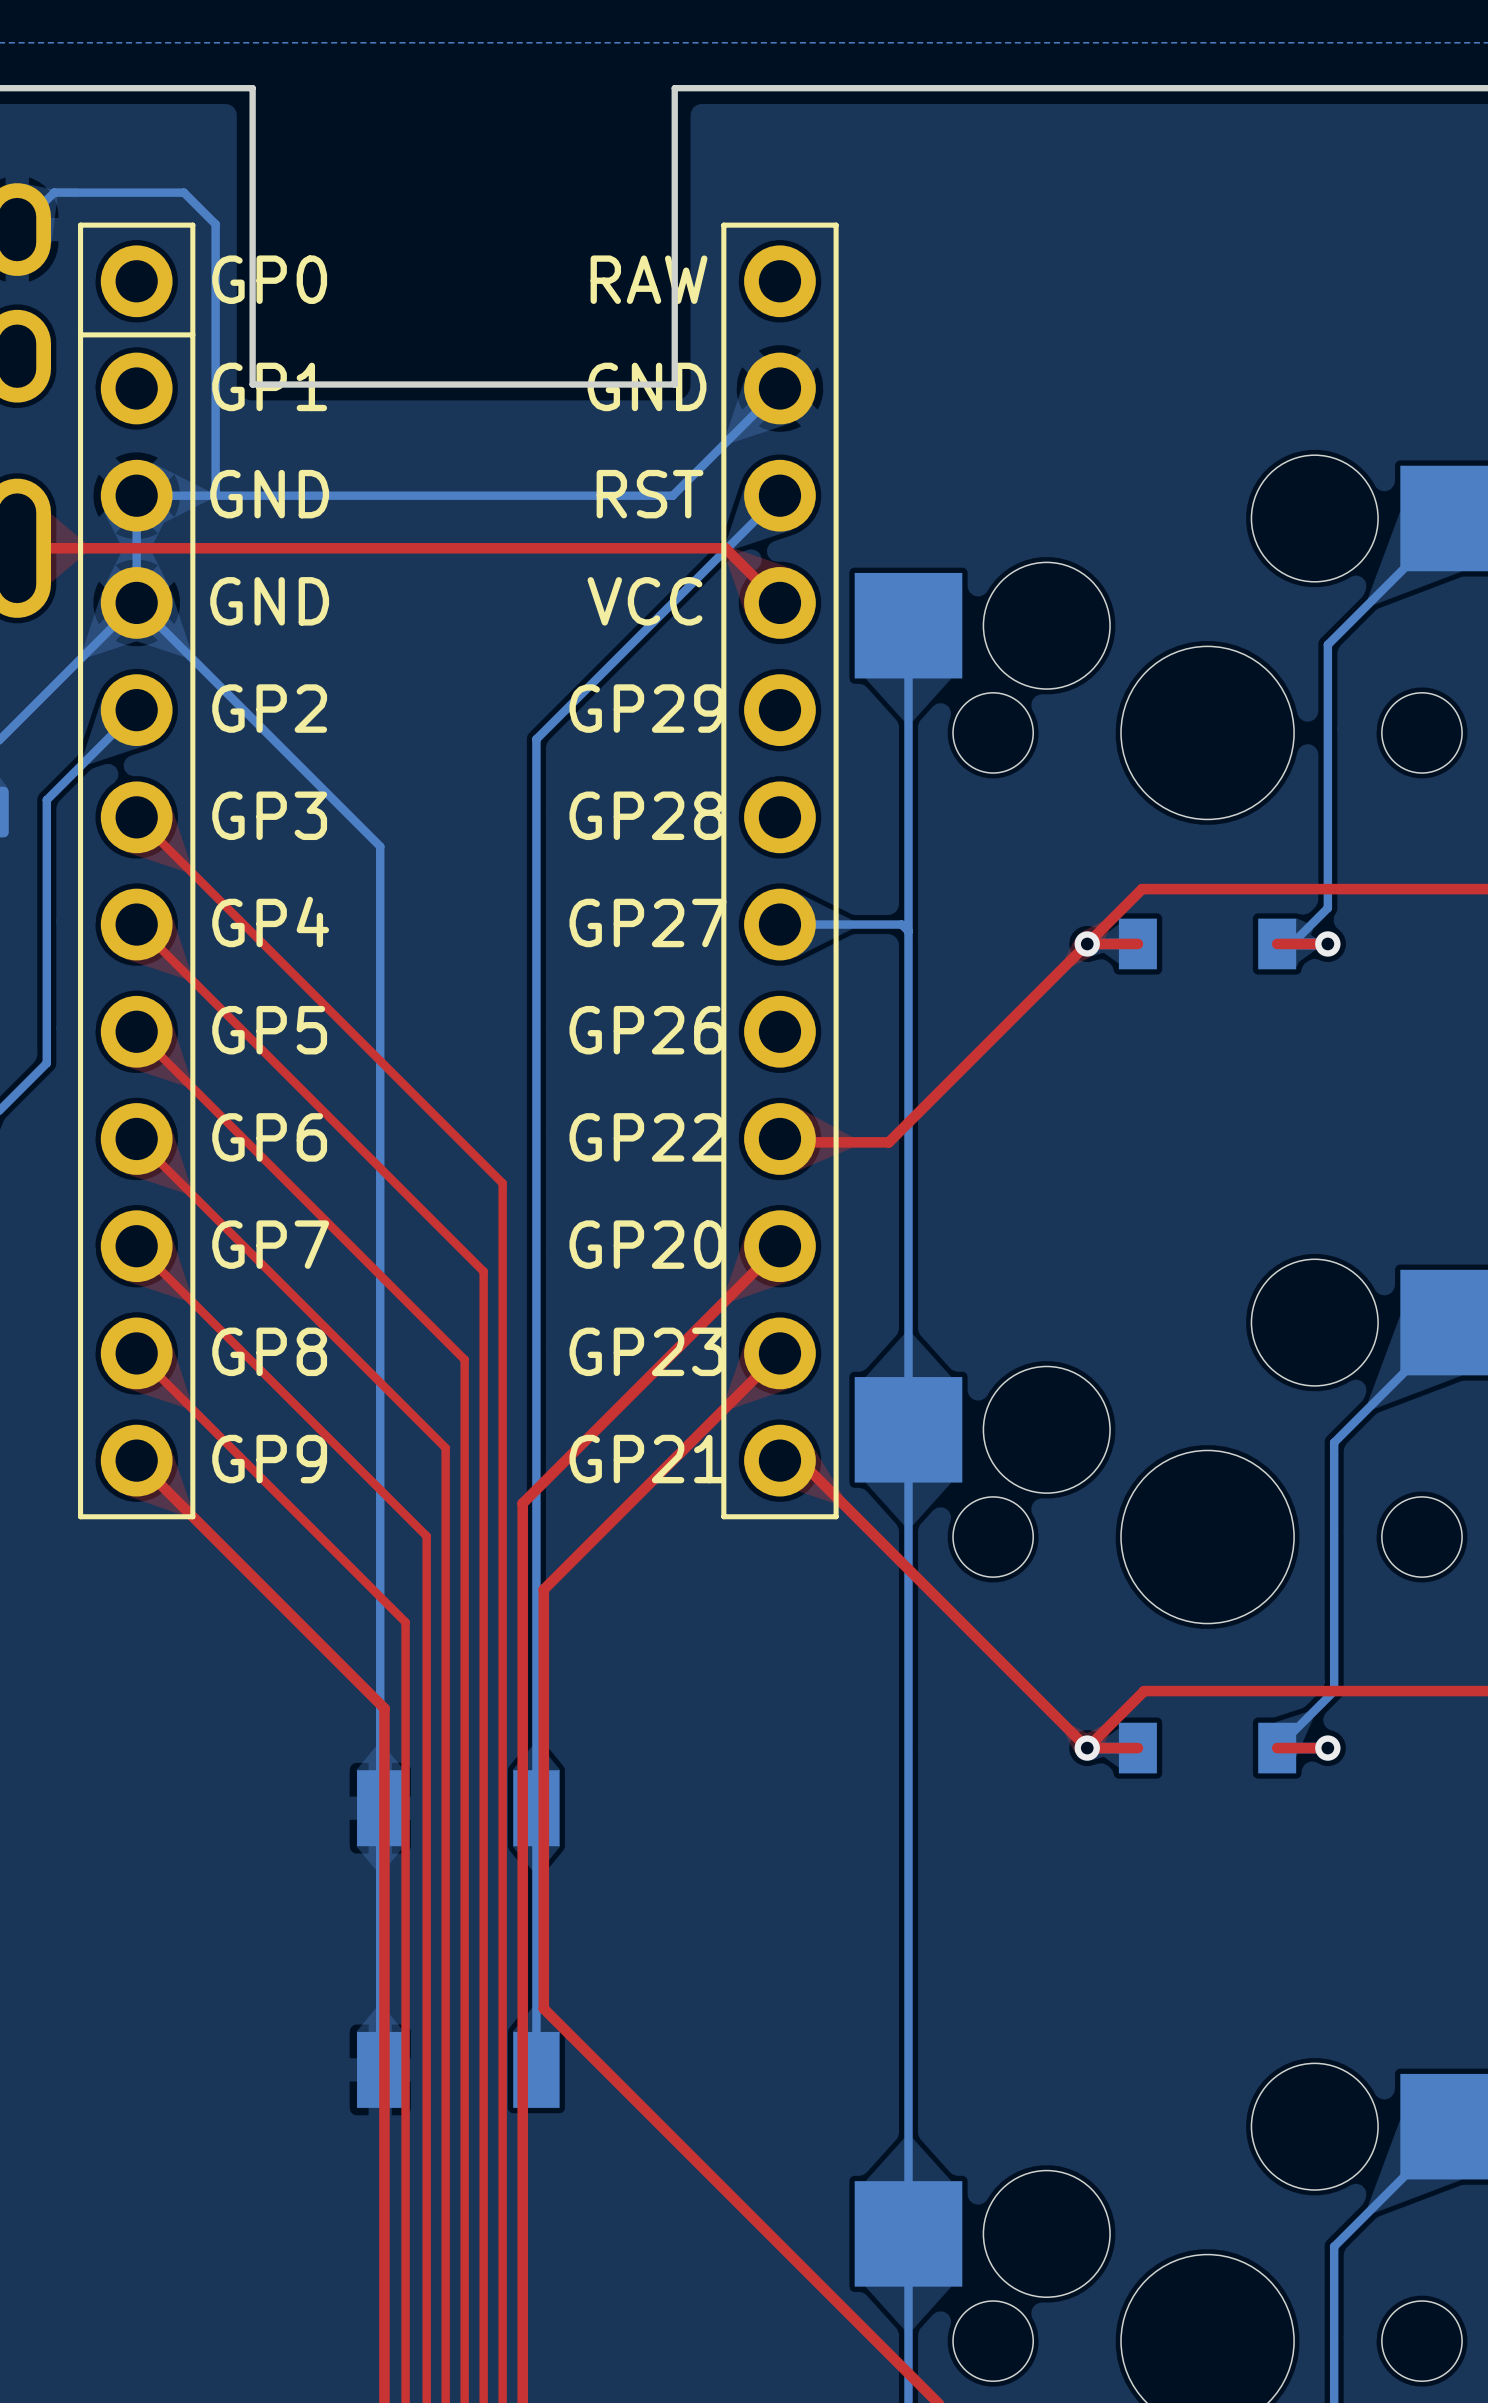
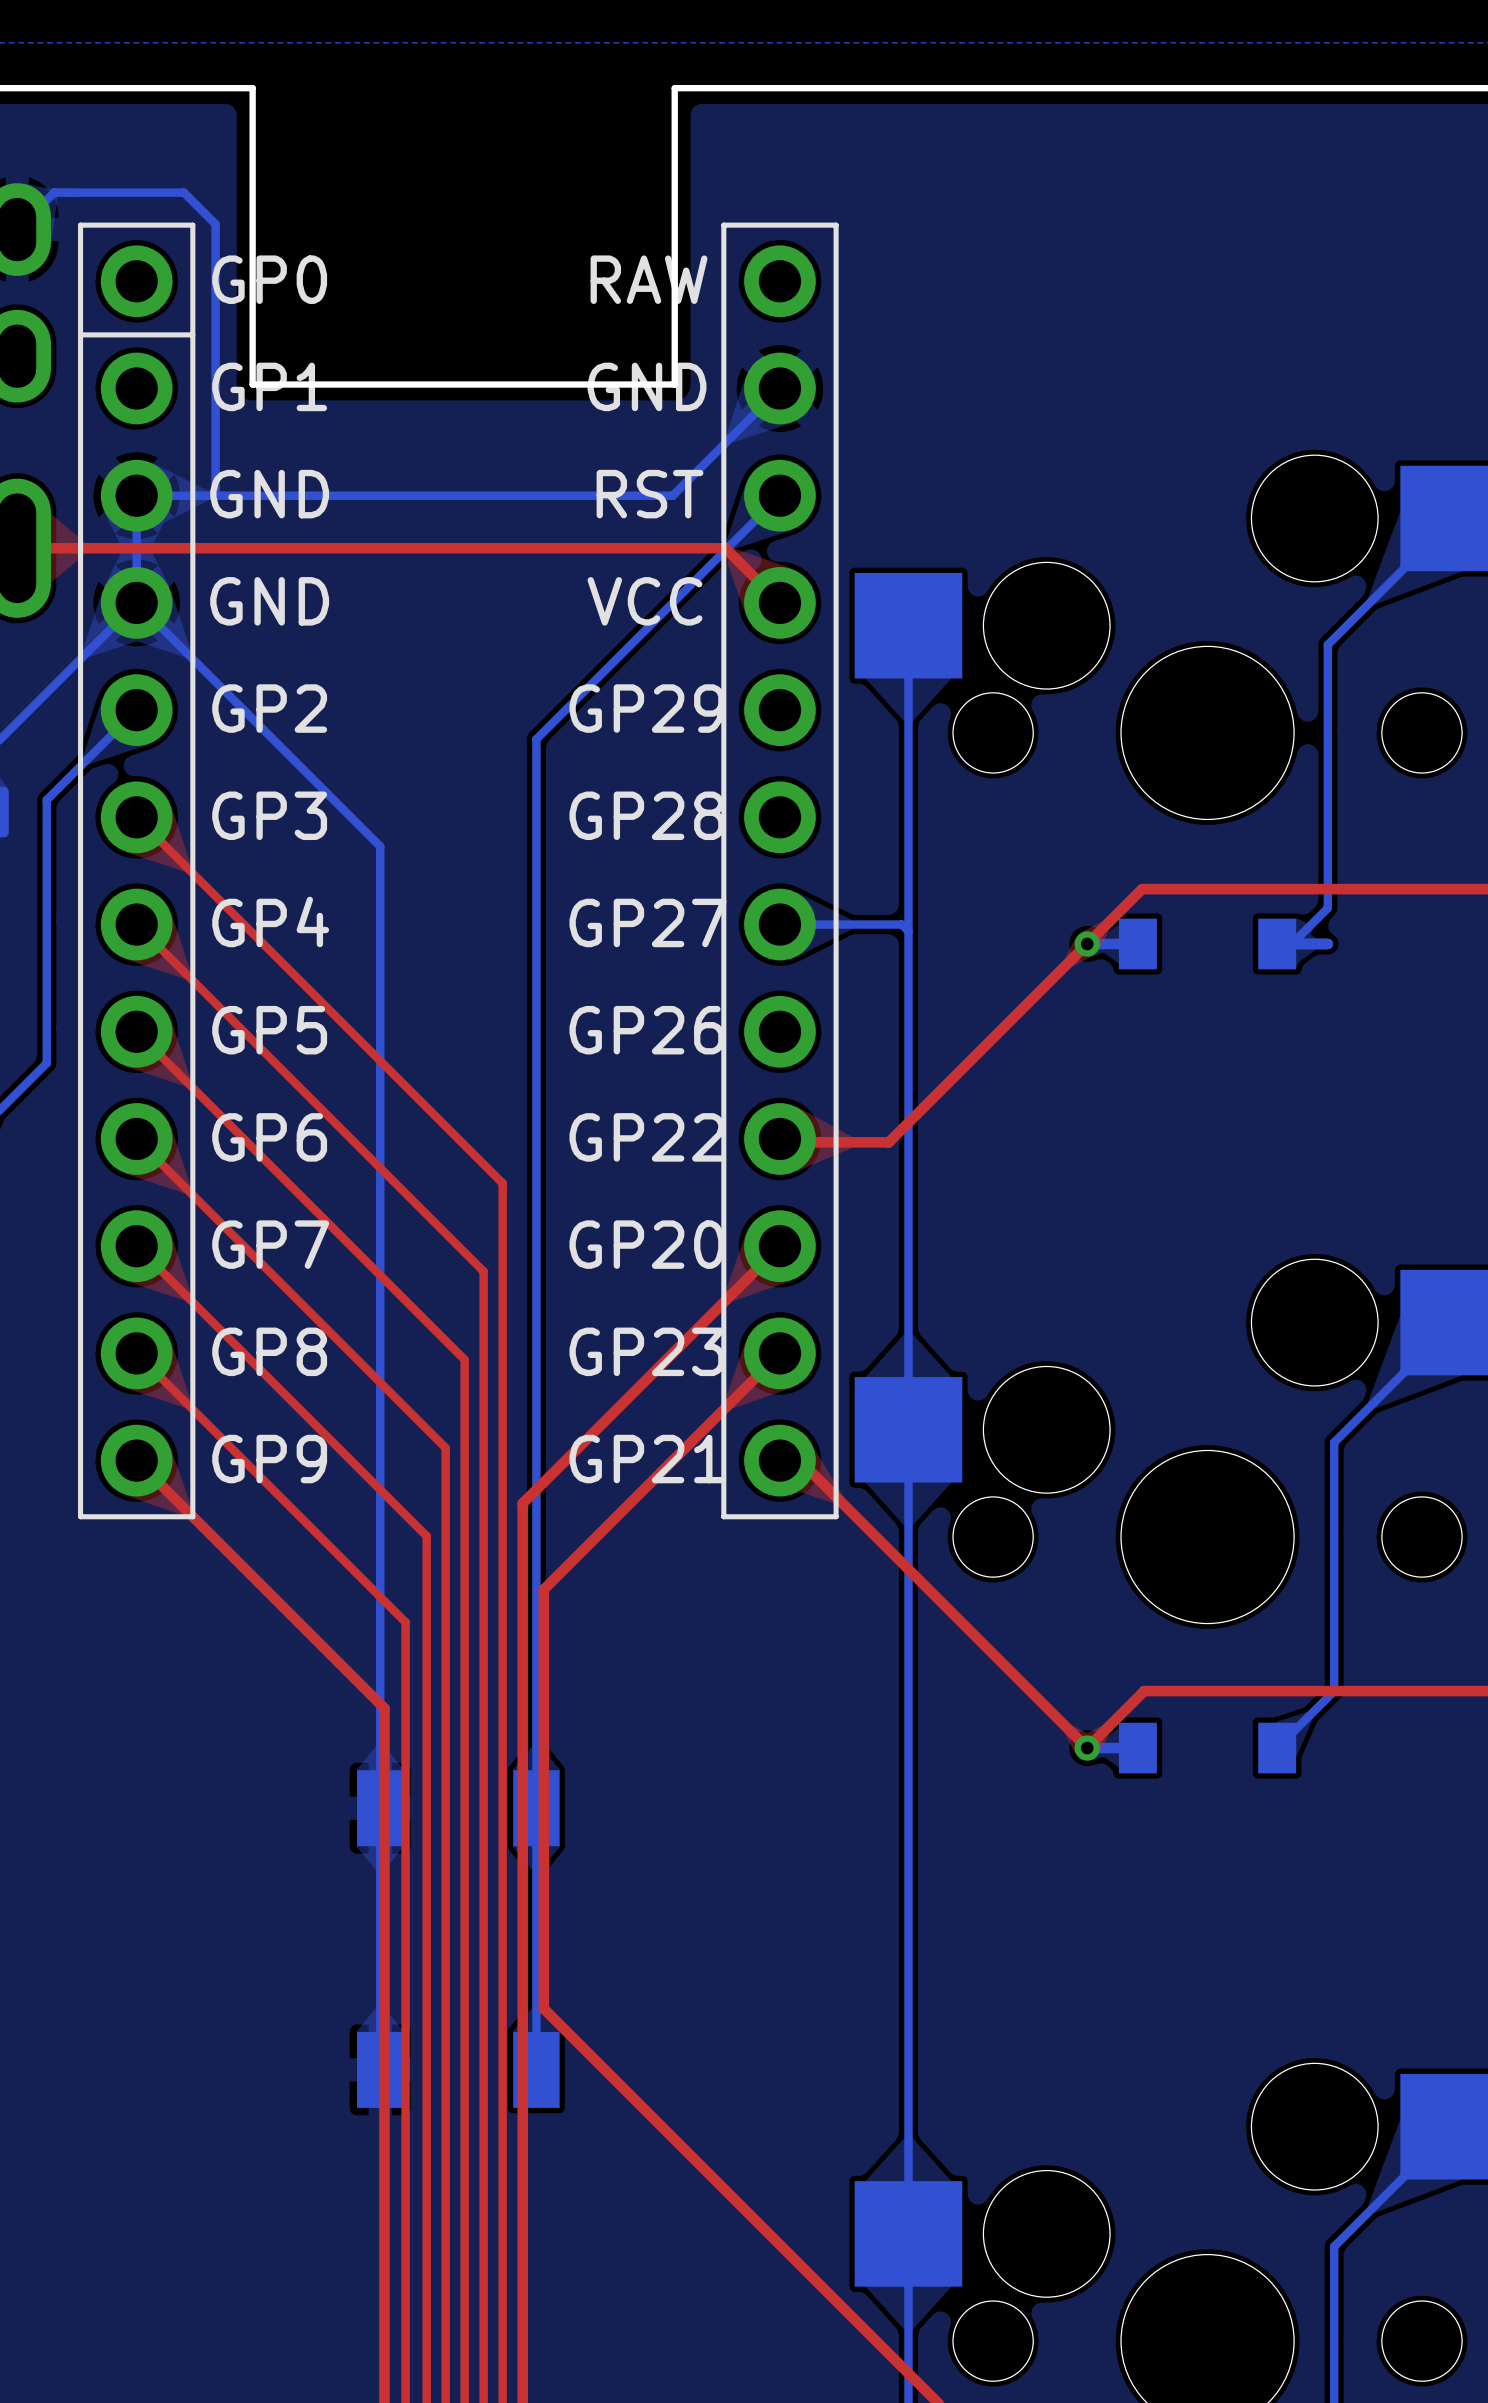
top track: (1087, 943) (1137, 943) -> none
top track: (1277, 943) (1327, 943) -> none
via: (1327, 943) -> none
top track: (1087, 1748) (1137, 1748) -> none
top track: (1277, 1748) (1327, 1748) -> none
via: (1327, 1748) -> none

